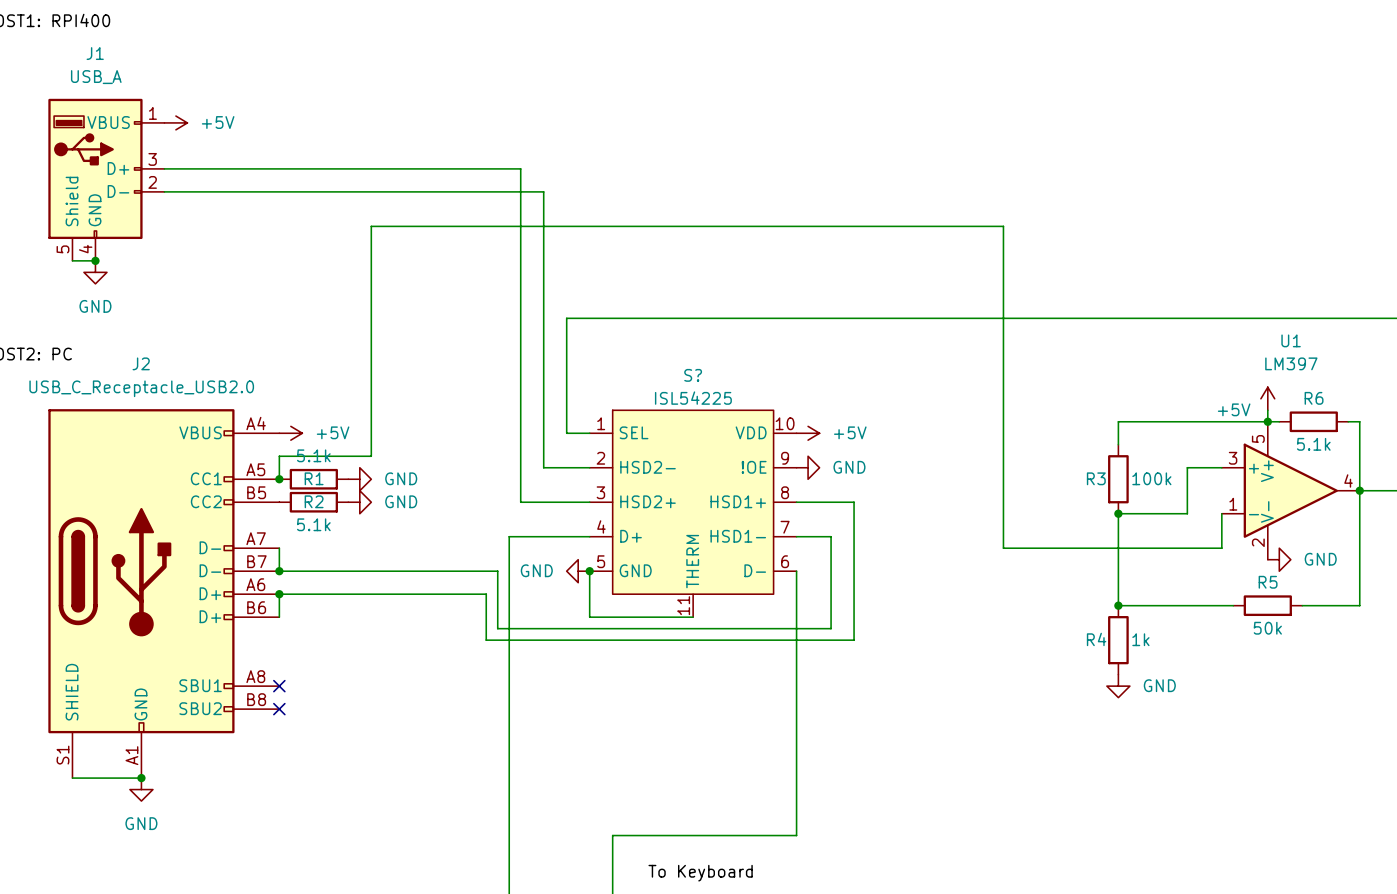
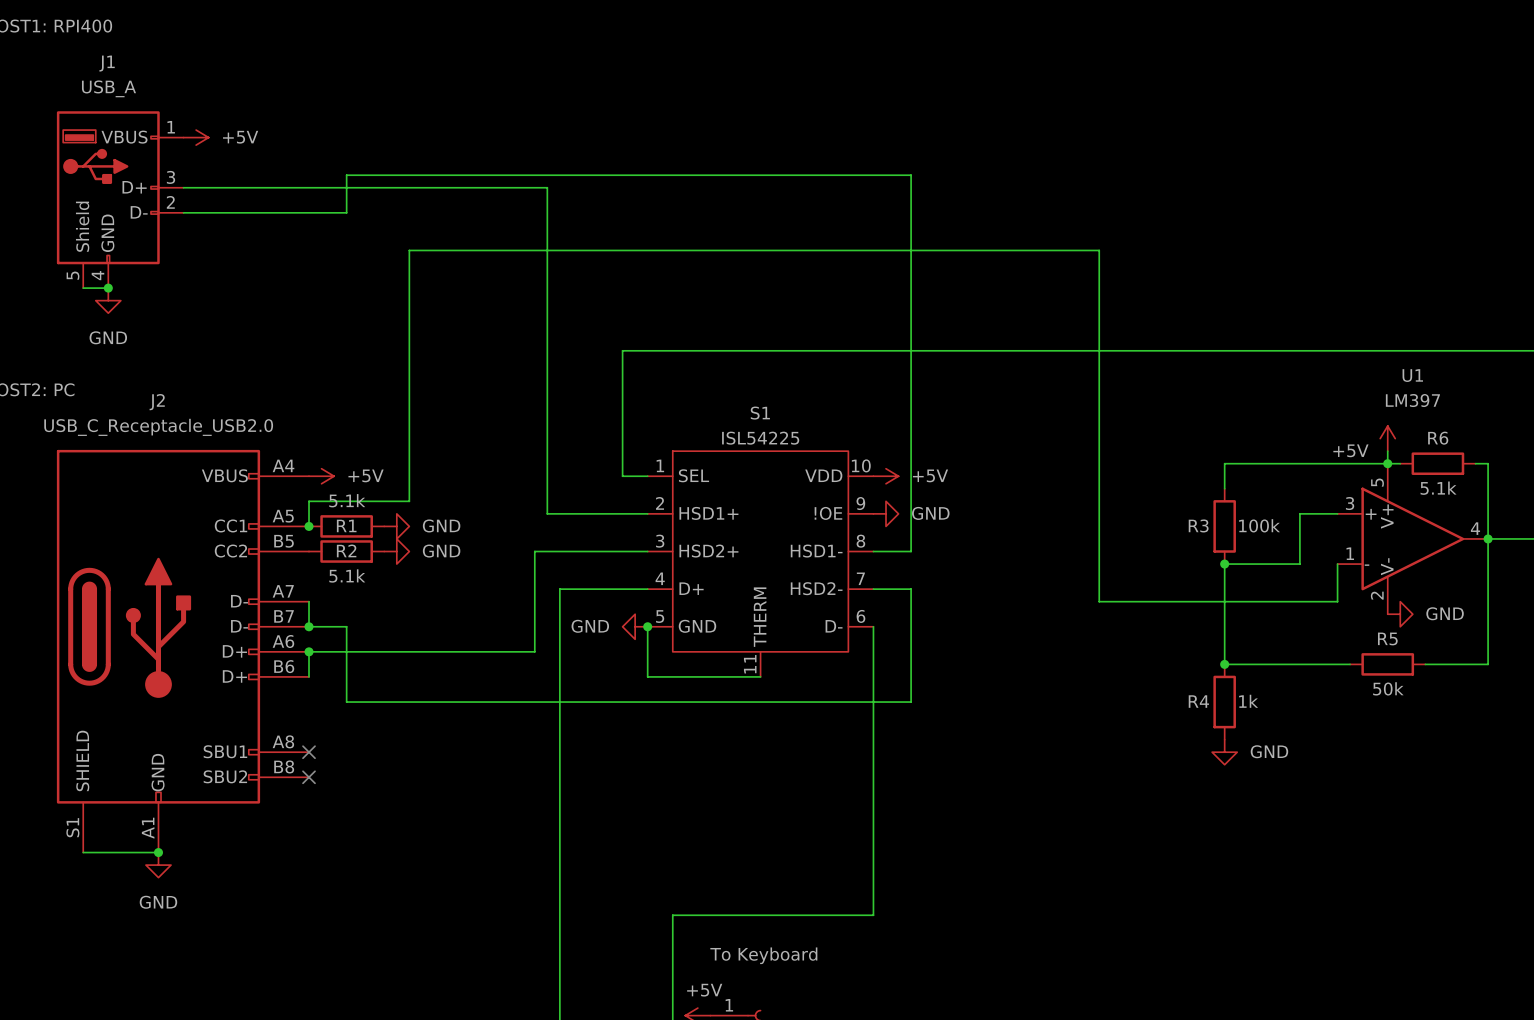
wire: (497, 168) (520, 168) (520, 502) -> (547, 187) (547, 513) (597, 513)
wire: (313, 191) (543, 191) (543, 467) -> (346, 212) (346, 175) (911, 175) (911, 551)
S? name: S? (693, 375) -> S1 (760, 413)
S? pin name: HSD2- (648, 467) -> HSD1+ (708, 513)
S? pin name: HSD1+ (738, 501) -> HSD1- (816, 551)
wire: (831, 502) (854, 502) (854, 640) (831, 640) -> (911, 689) (911, 702)
S? pin name: HSD1- (738, 536) -> HSD2- (816, 588)
wire: (313, 571) (497, 571) (497, 628) (831, 628) -> (346, 626) (346, 702) (534, 702)
wire: (486, 594) (486, 640) -> (534, 651) (534, 551) (572, 551)

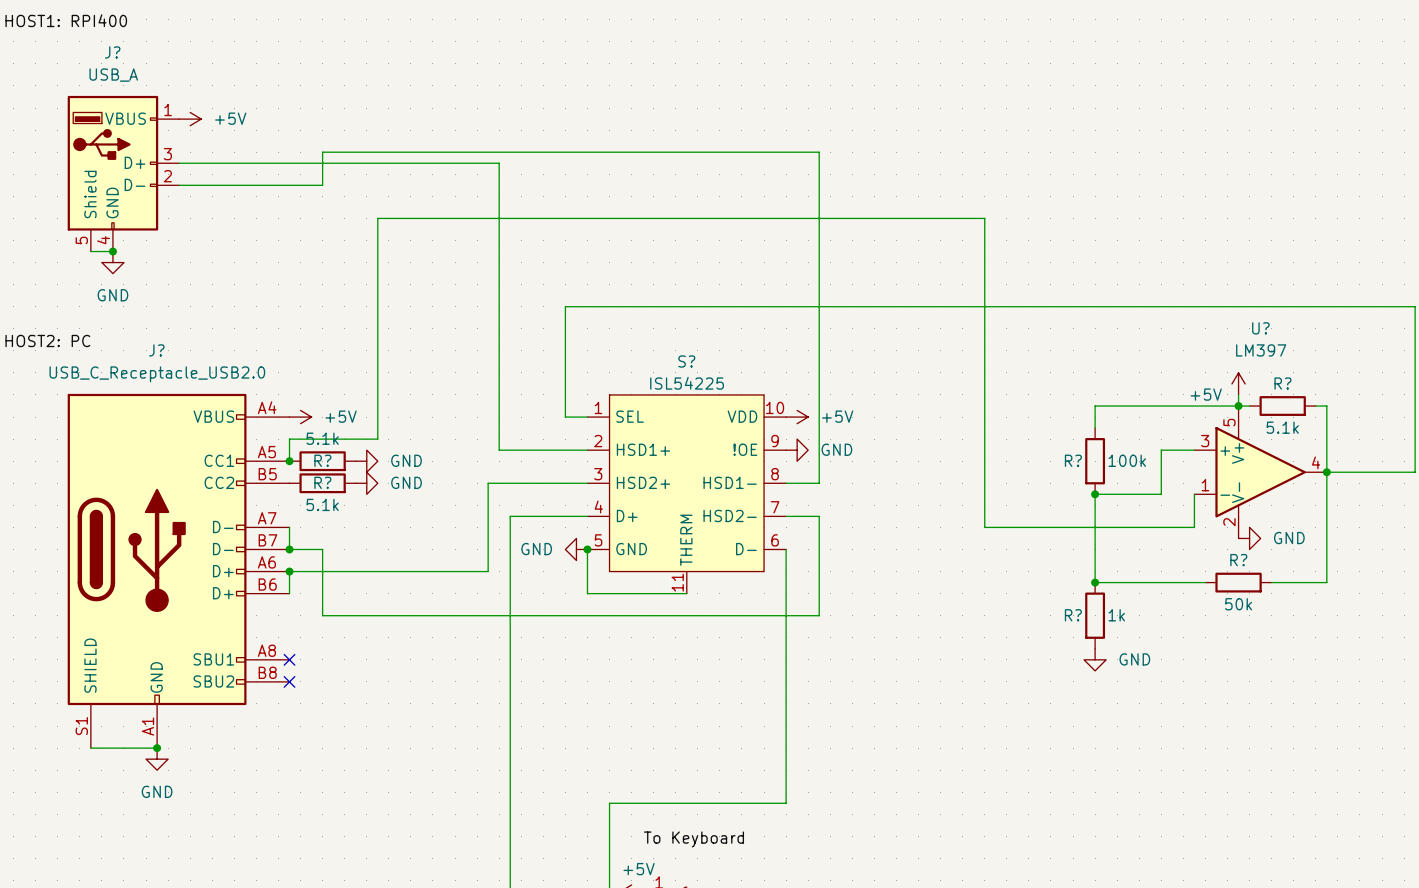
J1 name: J1 (107, 63) -> J? (112, 52)
U1 name: U1 (1412, 375) -> U? (1260, 328)
J2 name: J2 (157, 402) -> J? (156, 350)
S1 name: S1 (760, 413) -> S? (686, 361)
R6 name: R6 (1438, 438) -> R? (1282, 383)
R1 name: R1 (346, 525) -> R? (322, 460)
R3 name: R3 (1198, 525) -> R? (1073, 460)
R2 name: R2 (346, 550) -> R? (322, 482)
R5 name: R5 (1387, 638) -> R? (1238, 560)
R4 name: R4 (1198, 701) -> R? (1073, 615)

